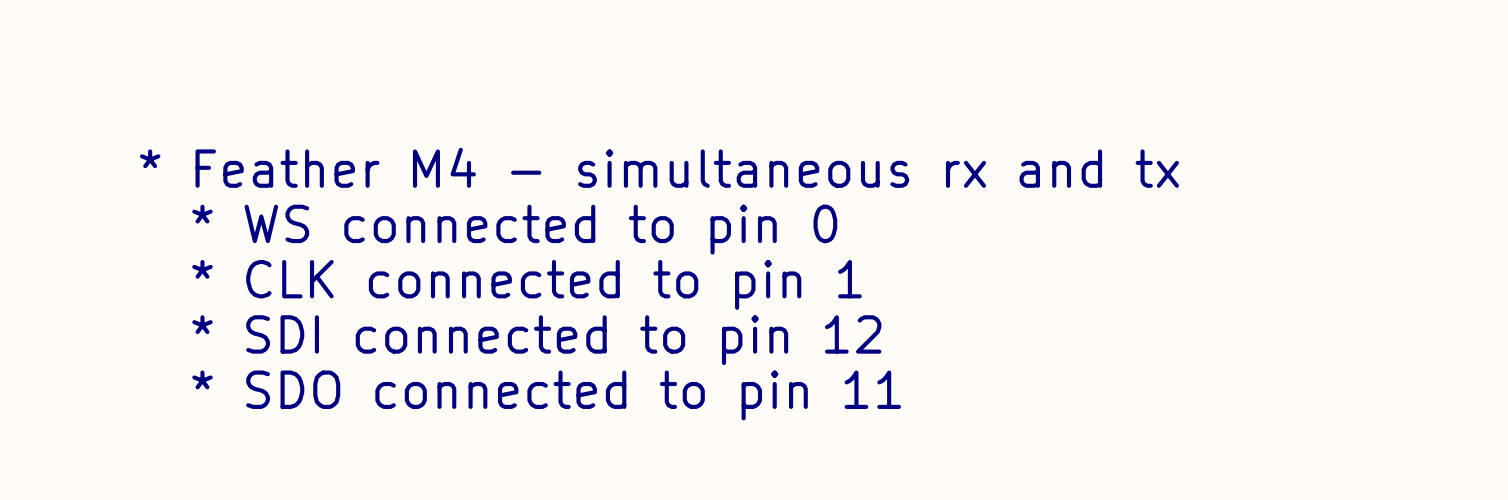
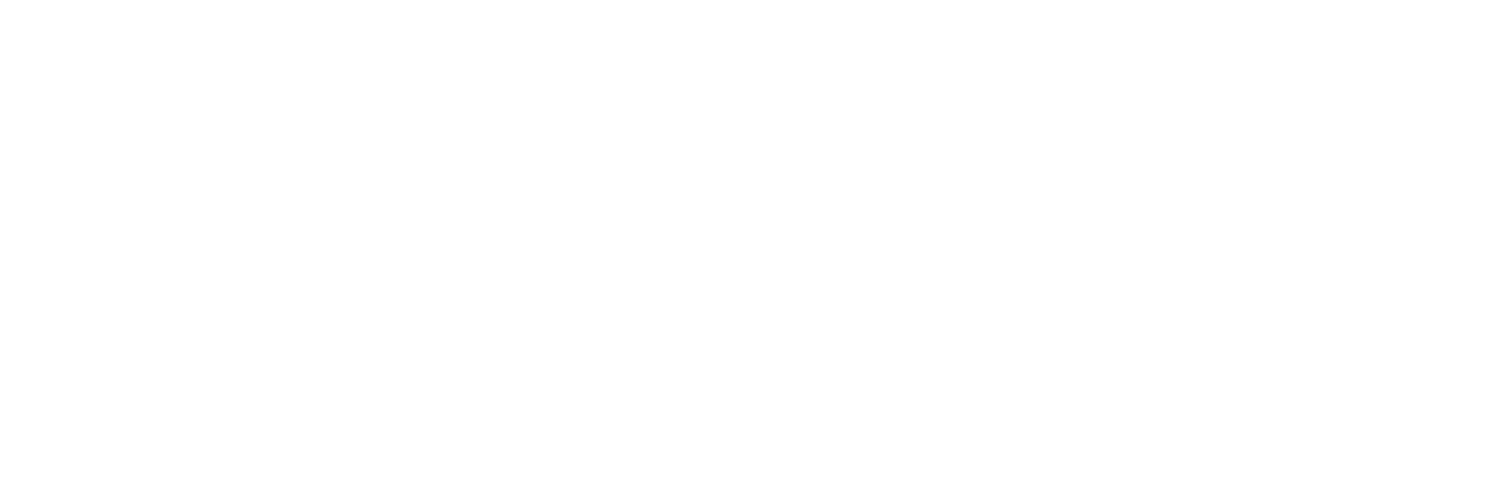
text: * Feather M4 - simultaneous rx and tx (659, 167) -> none
text: * WS connected to pin 0 (514, 229) -> none
text: * CLK connected to pin 1 (527, 284) -> none
text: * SDI connected to pin 12 (536, 340) -> none
text: * SDO connected to pin 11 (546, 395) -> none

